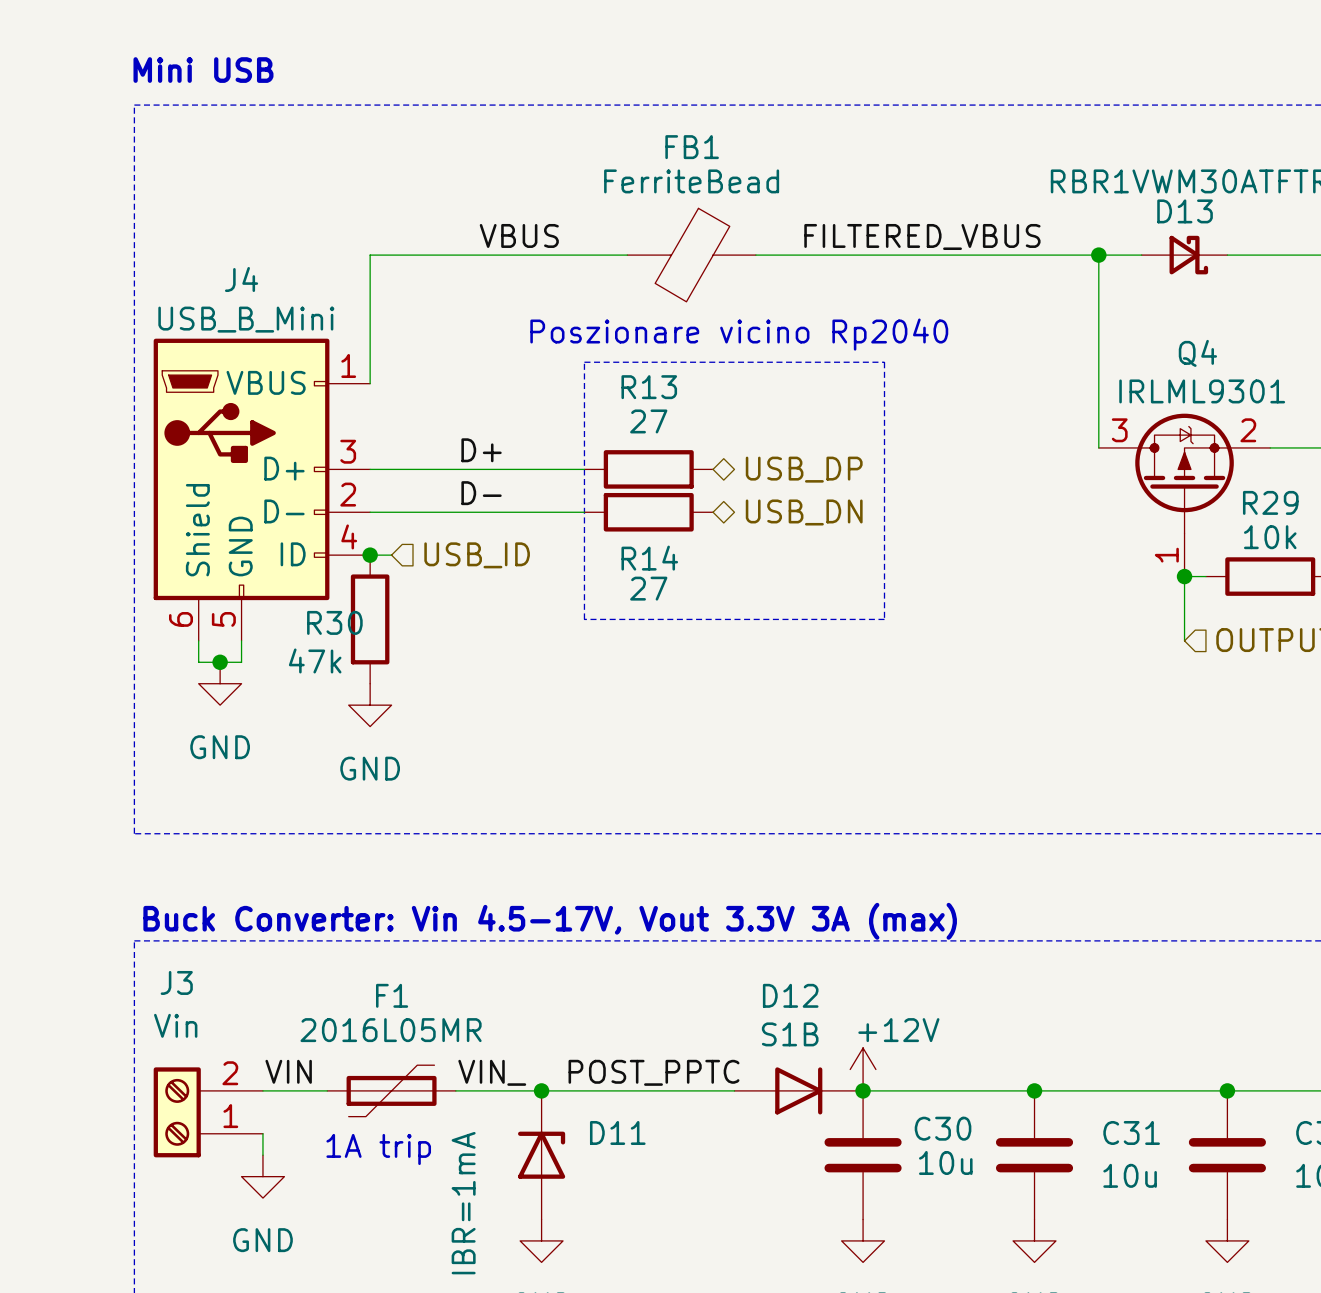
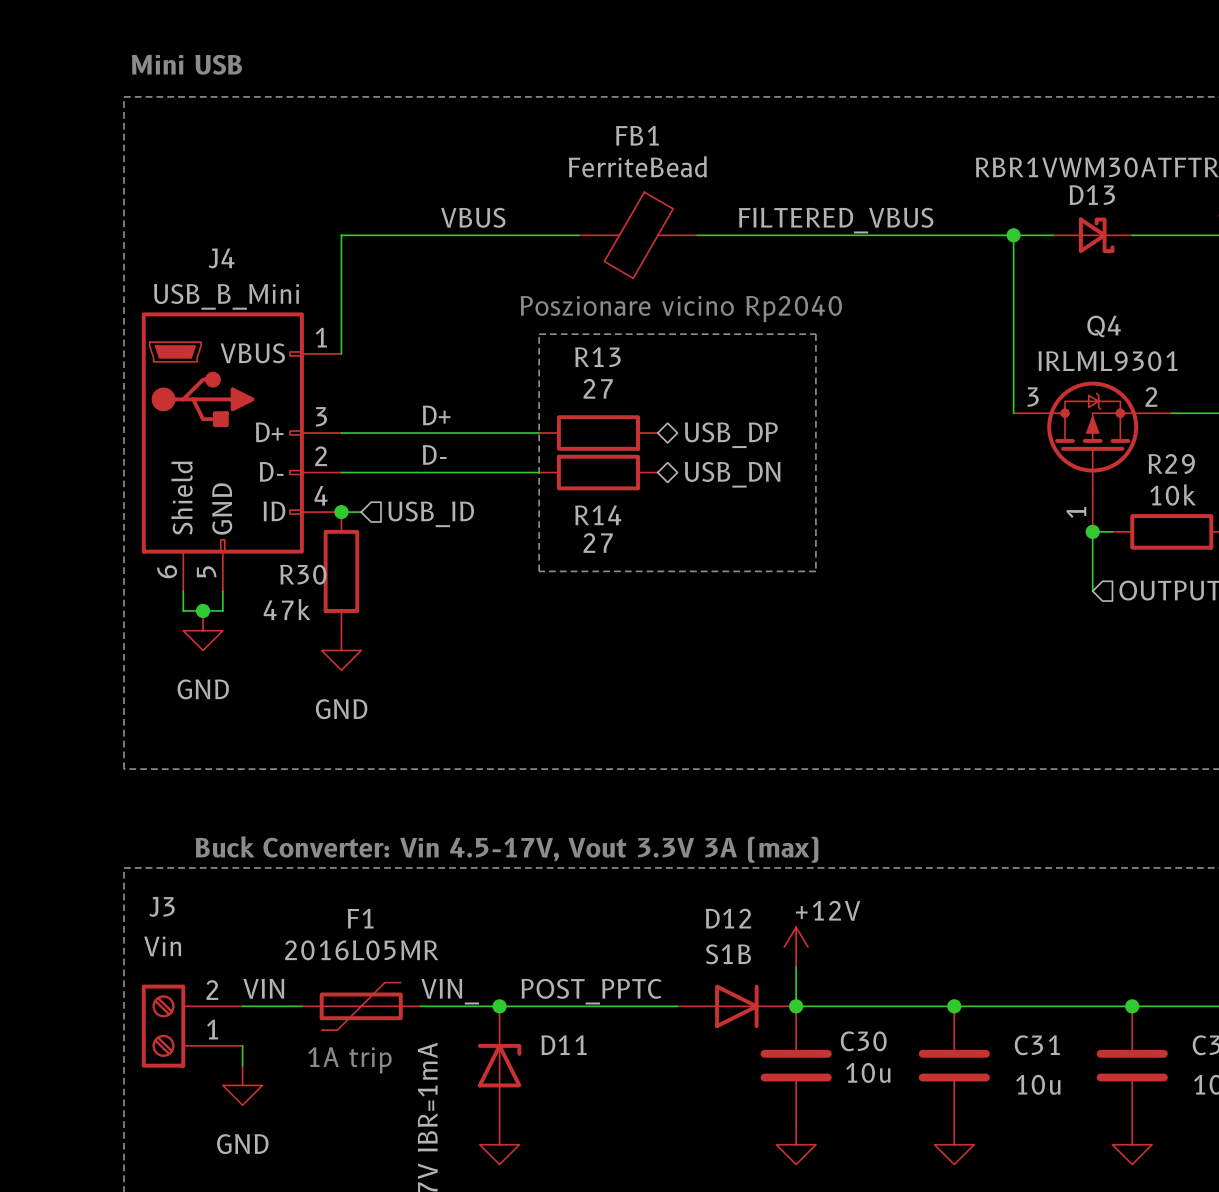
power symbol position: +12V (863, 1069) -> +12V (796, 947)

